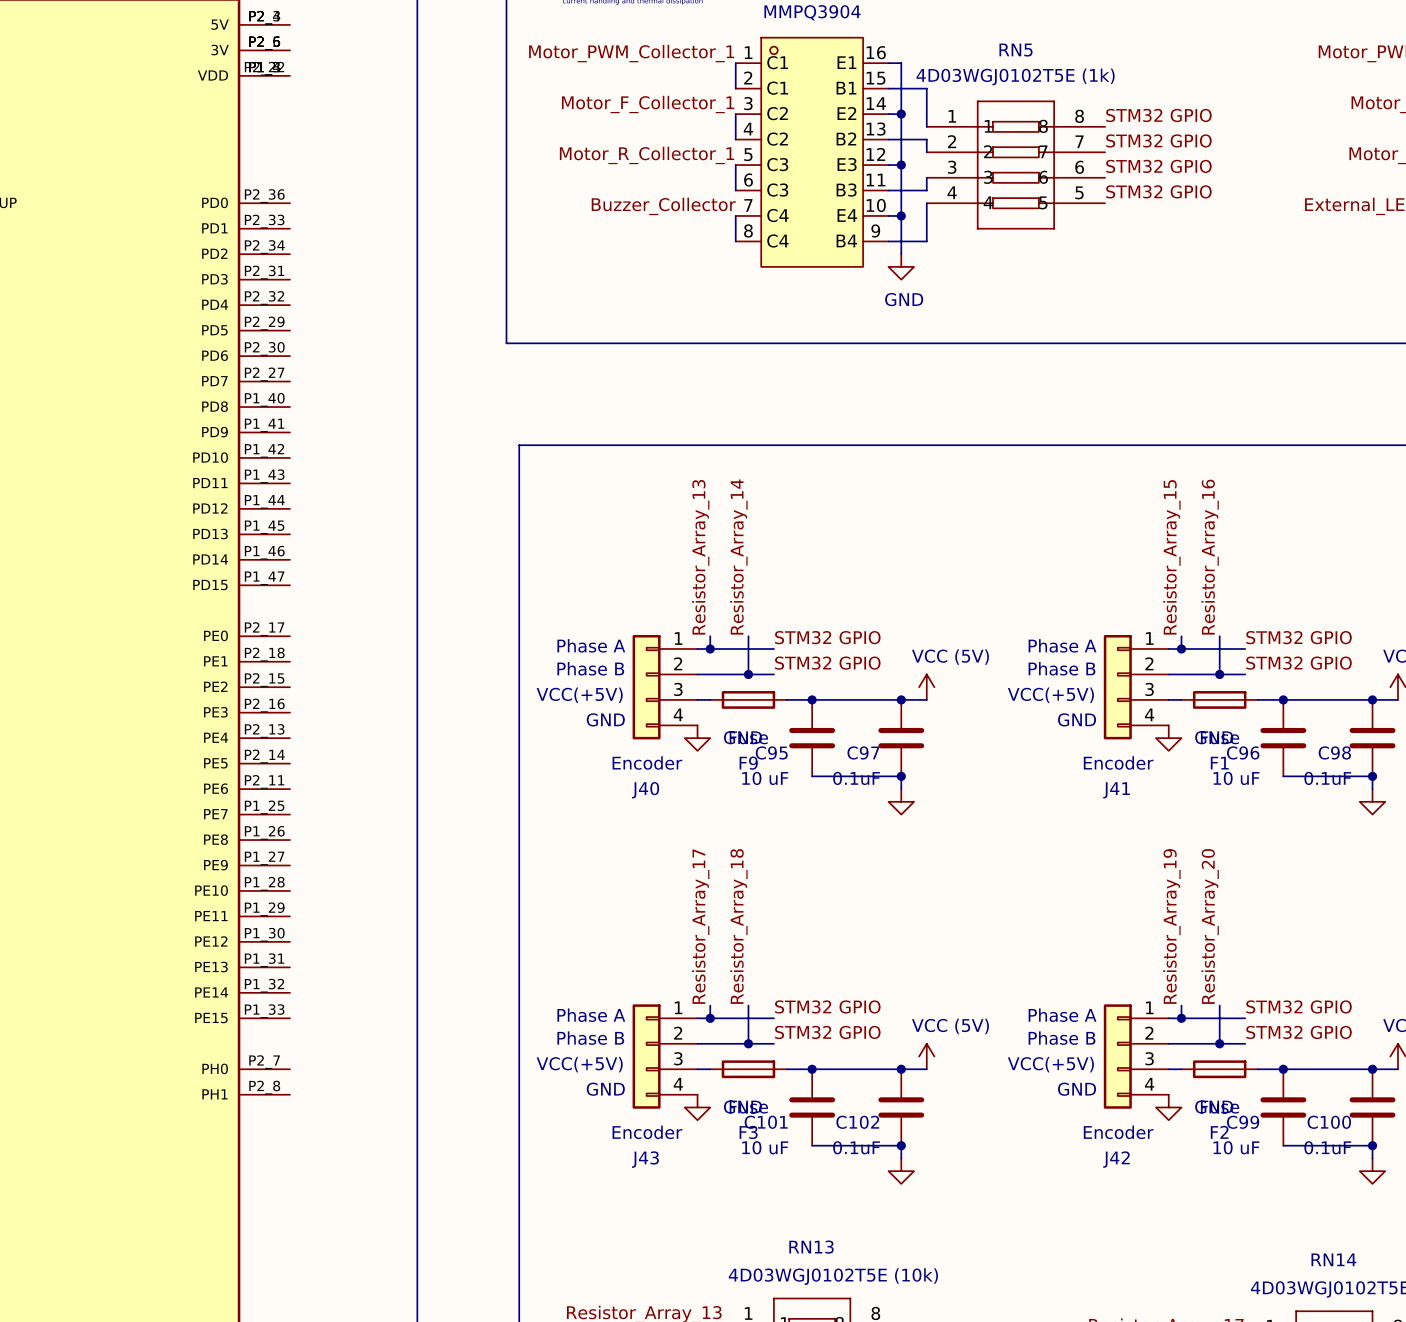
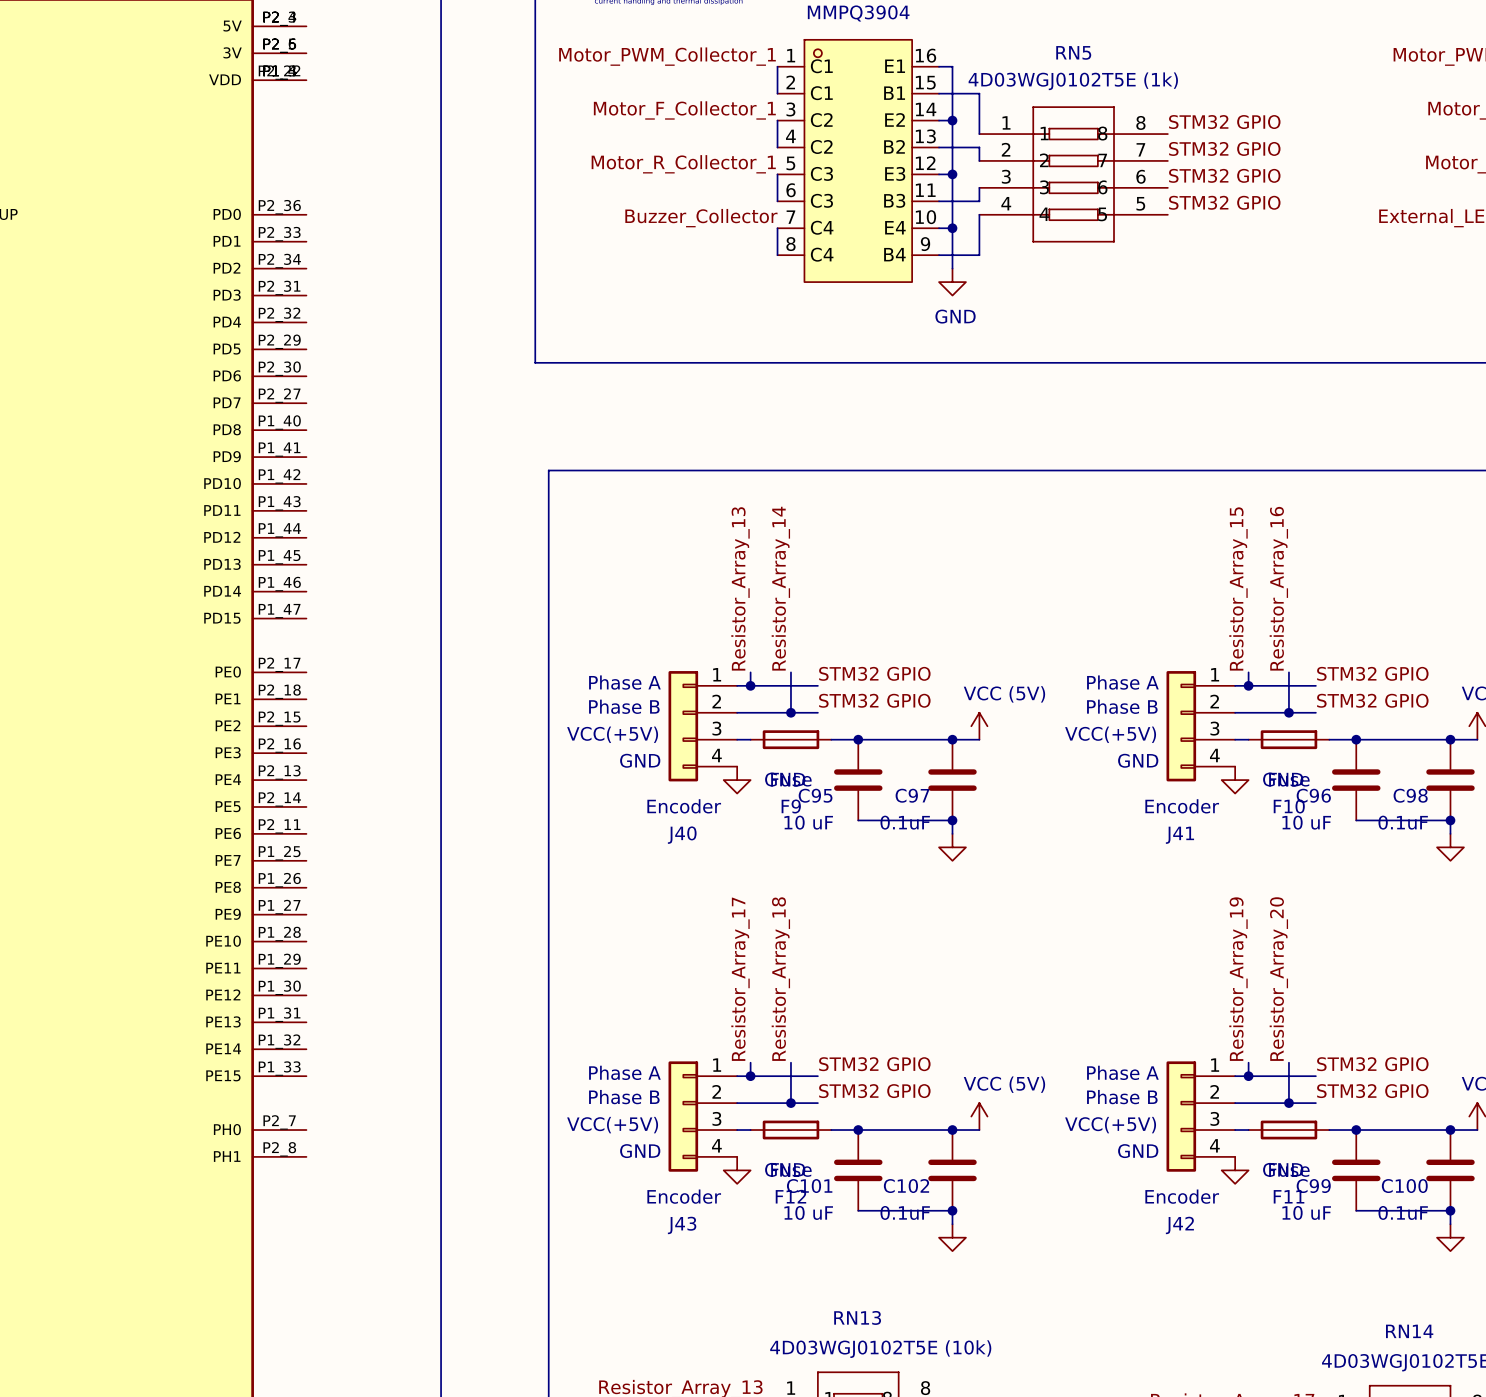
F1 name: F1 (1219, 763) -> F10 (1289, 806)
F3 name: F3 (748, 1132) -> F12 (790, 1196)
F2 name: F2 (1219, 1132) -> F11 (1289, 1196)

